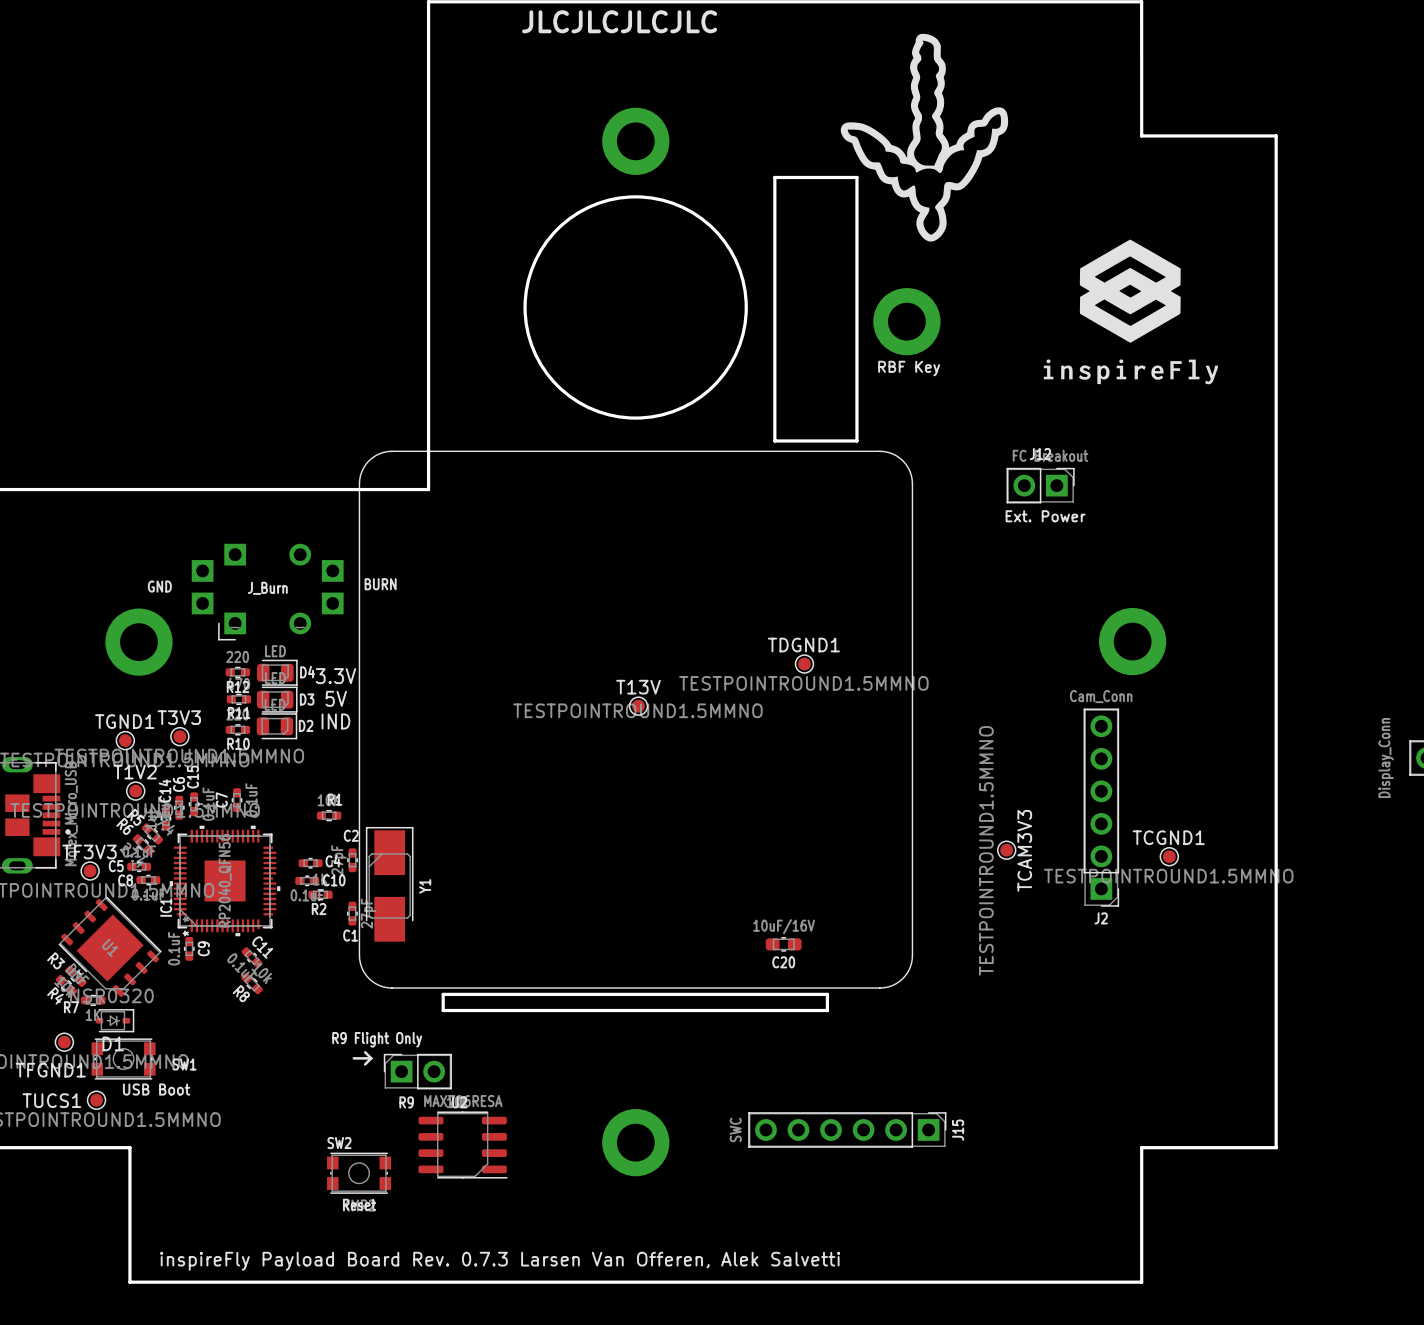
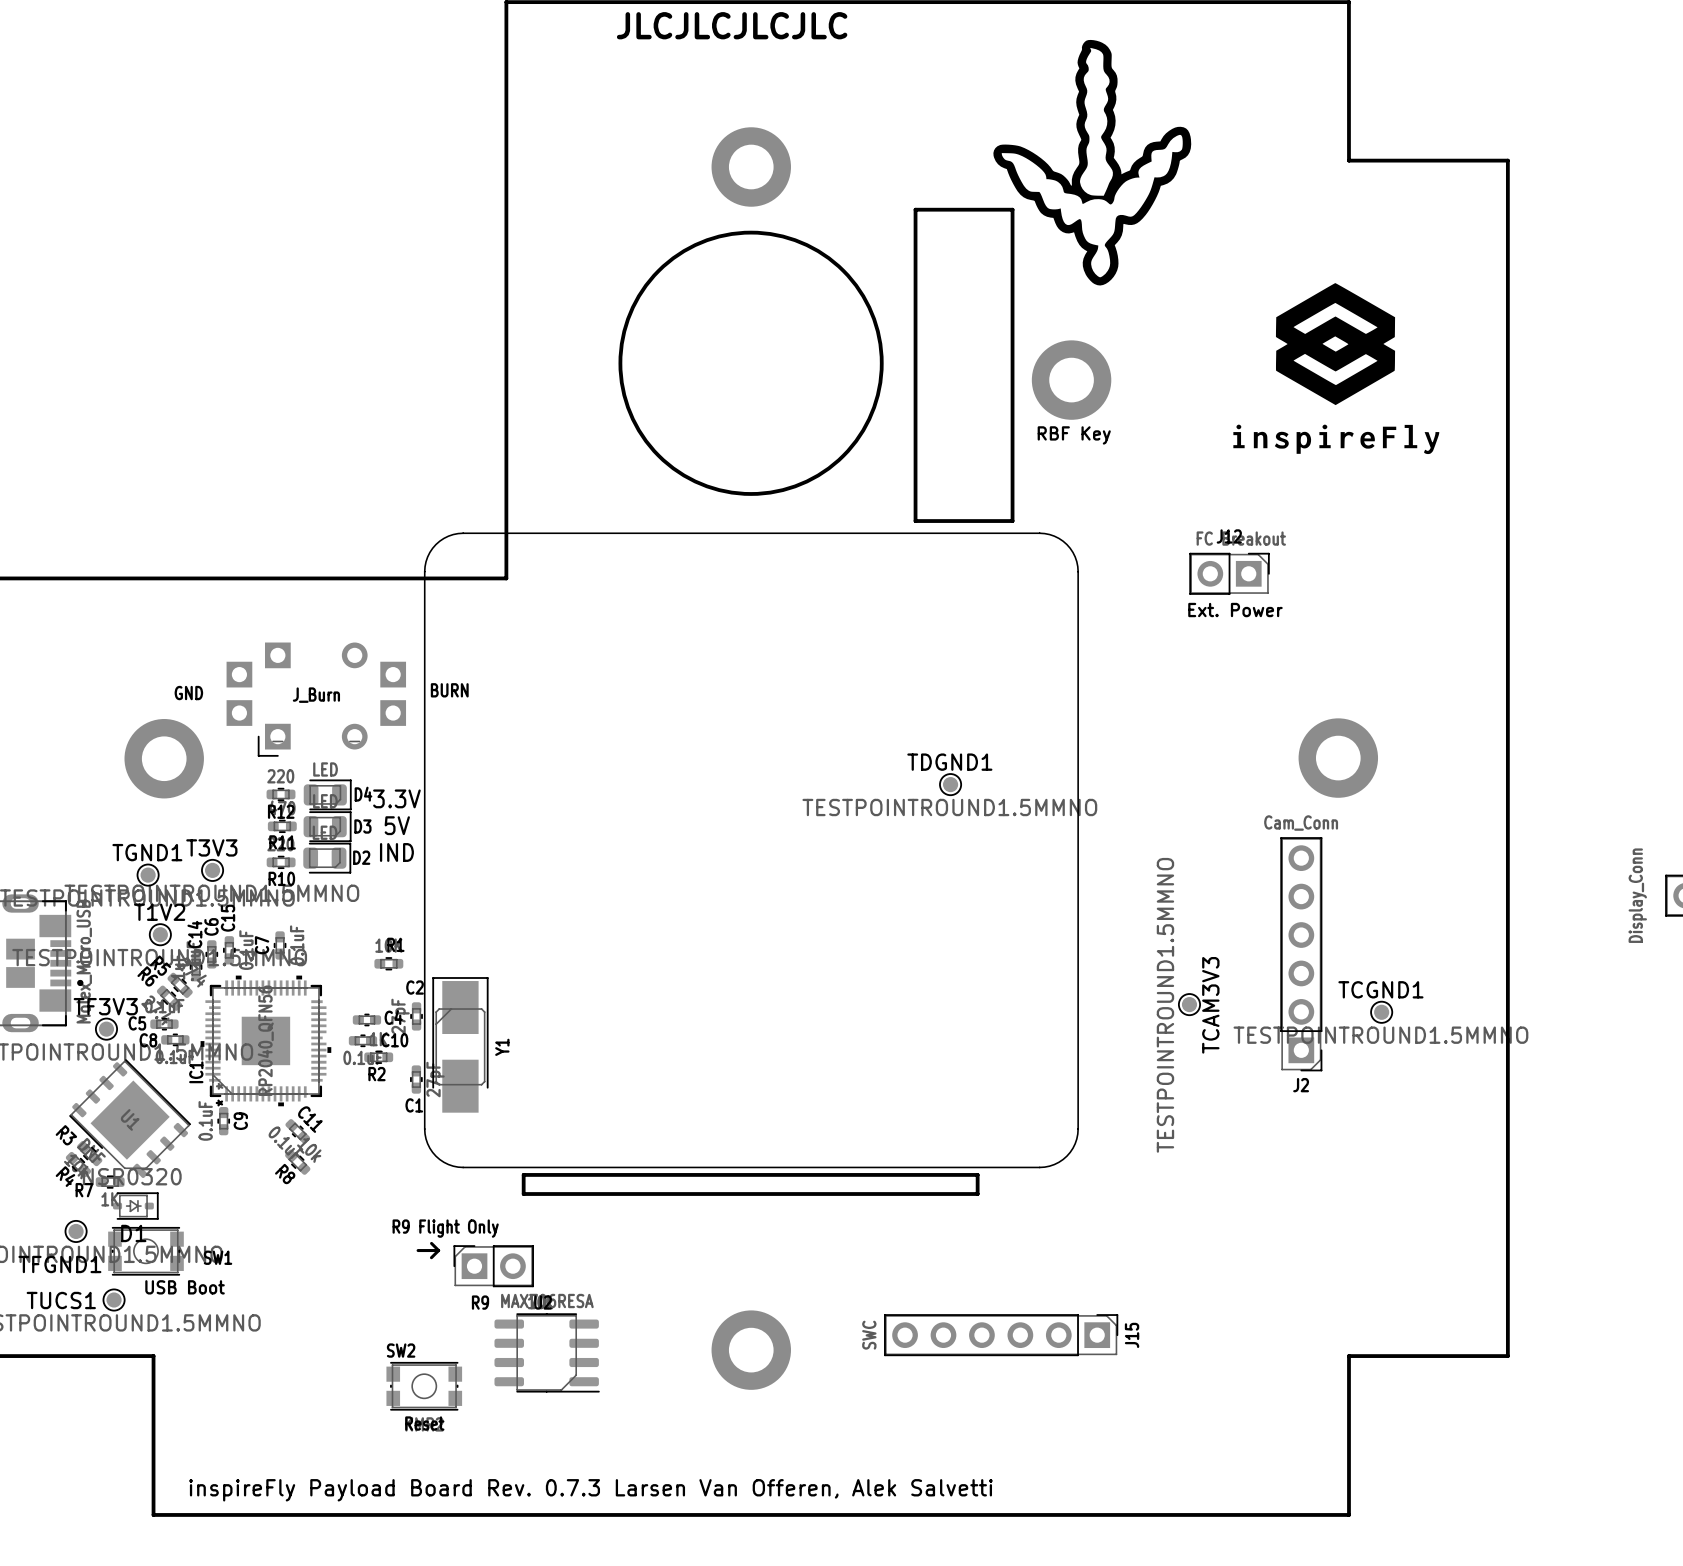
T13V: TESTPOINTROUND1.5MMNO (638, 706) -> none
C20: 10uF/16V (783, 944) -> none

